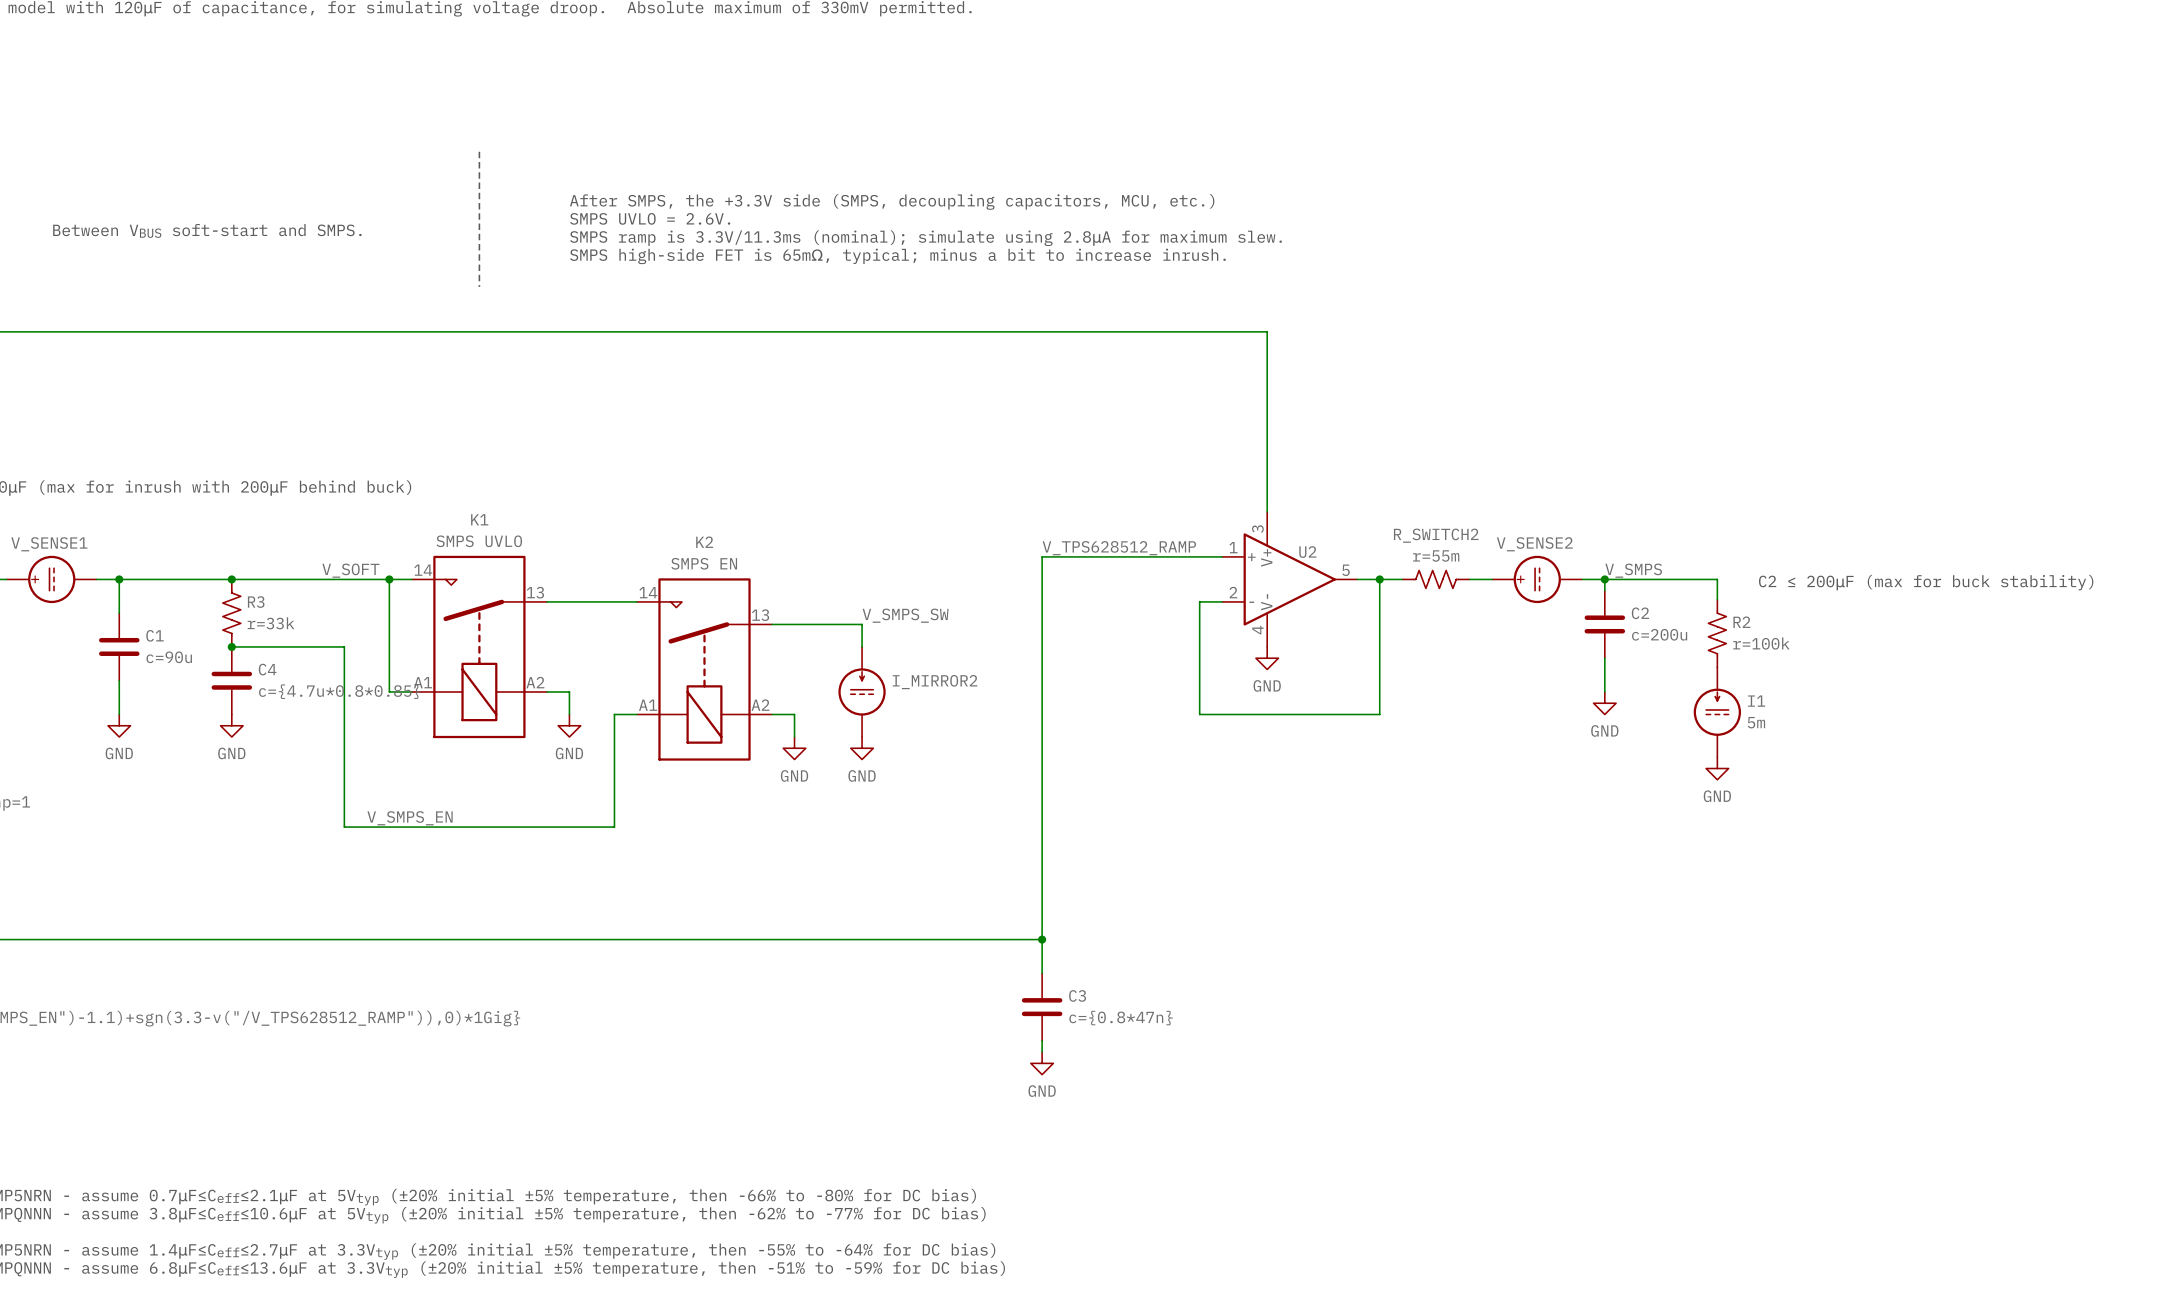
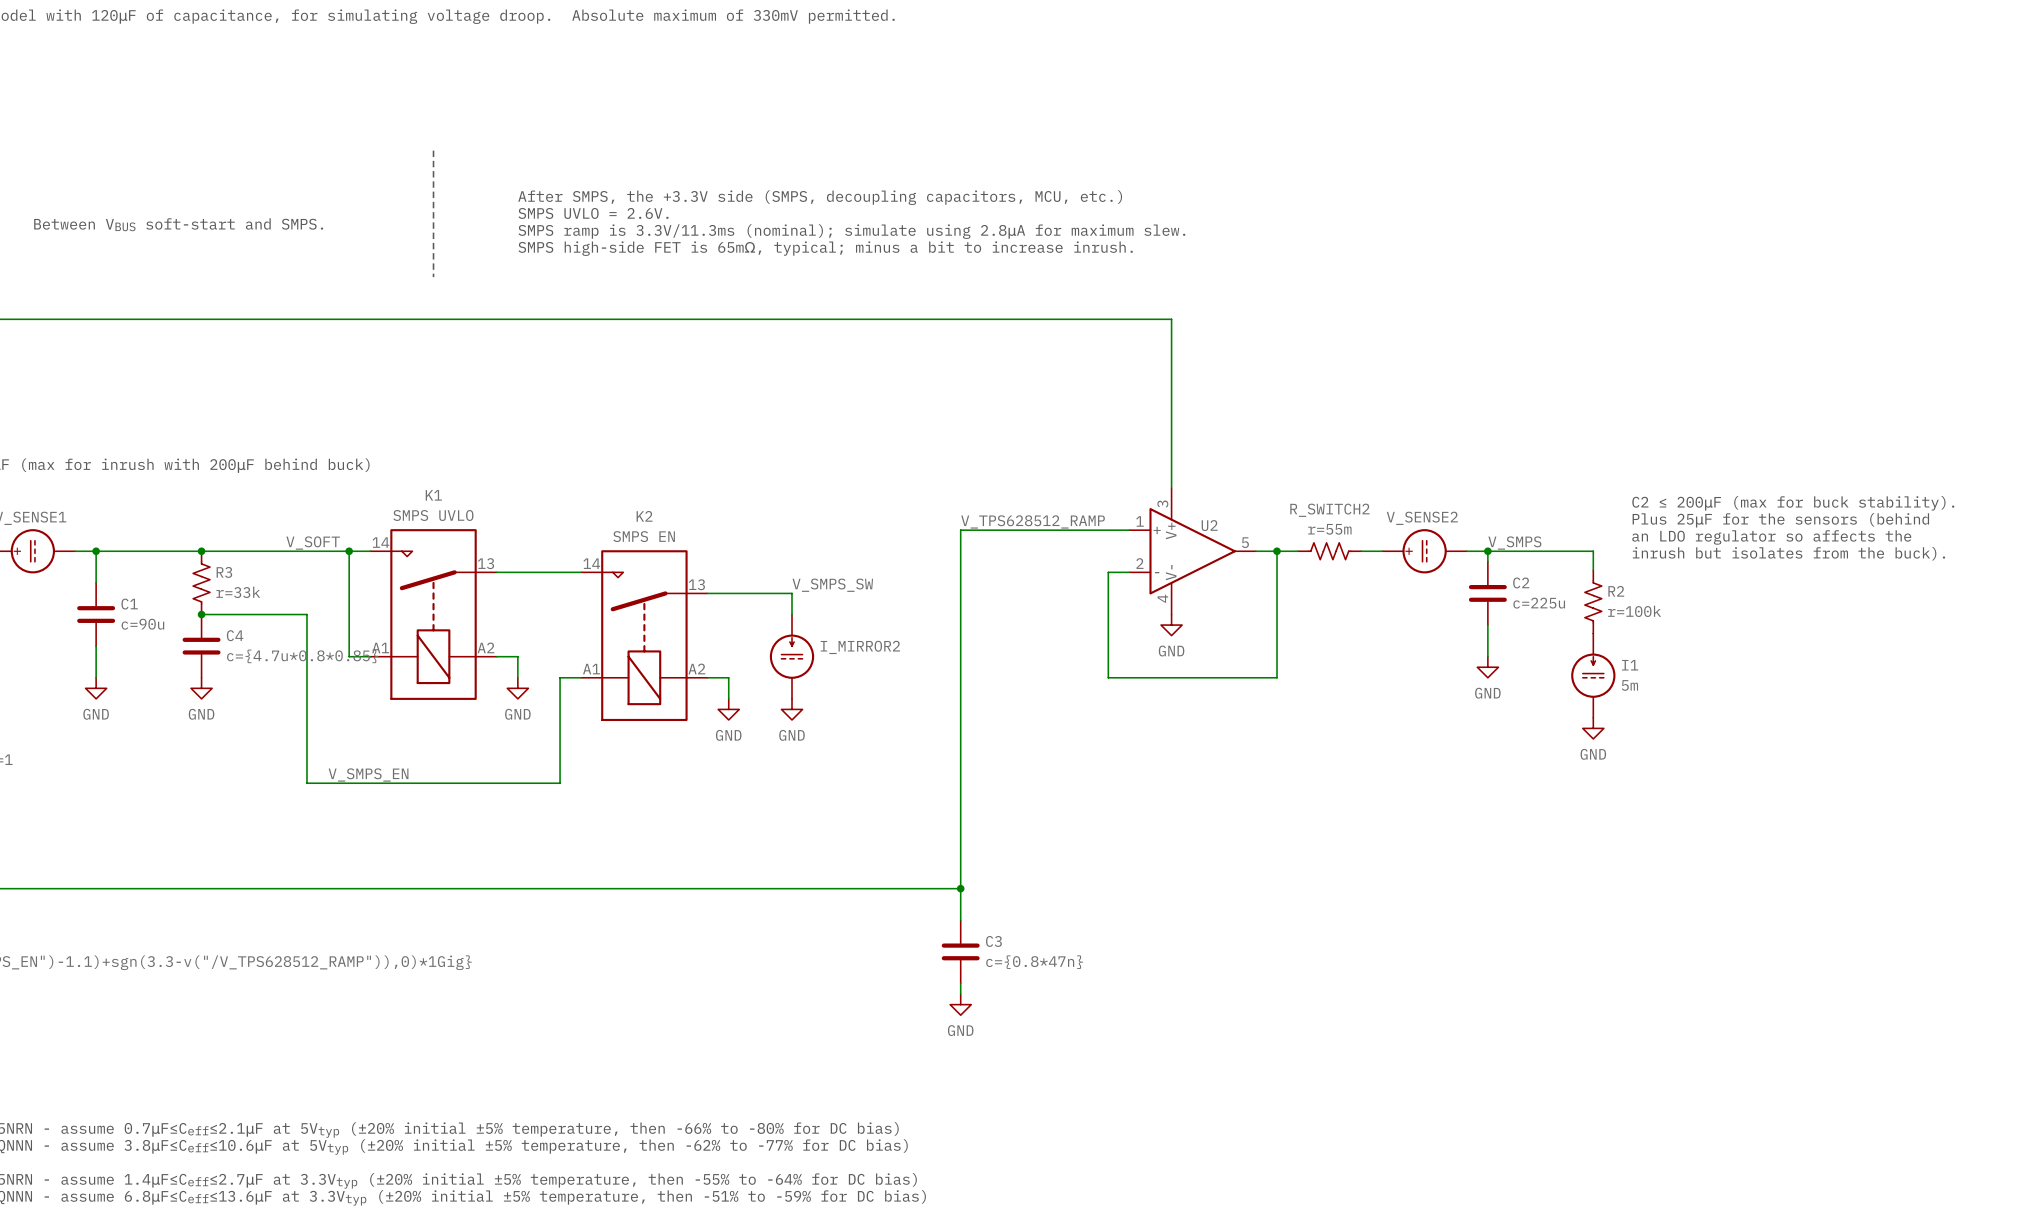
text: none -> C2 ≤ 200μF (max for buck stability). (1793, 503)
text: none -> Plus 25μF for the sensors (behind (1780, 520)
text: none -> an LDO regulator so affects the (1771, 537)
text: C2 ≤ 200μF (max for buck stability) (1926, 582) -> inrush but isolates from the buck). (1788, 553)
C2 value: c=200u (1659, 634) -> c=225u (1539, 603)

